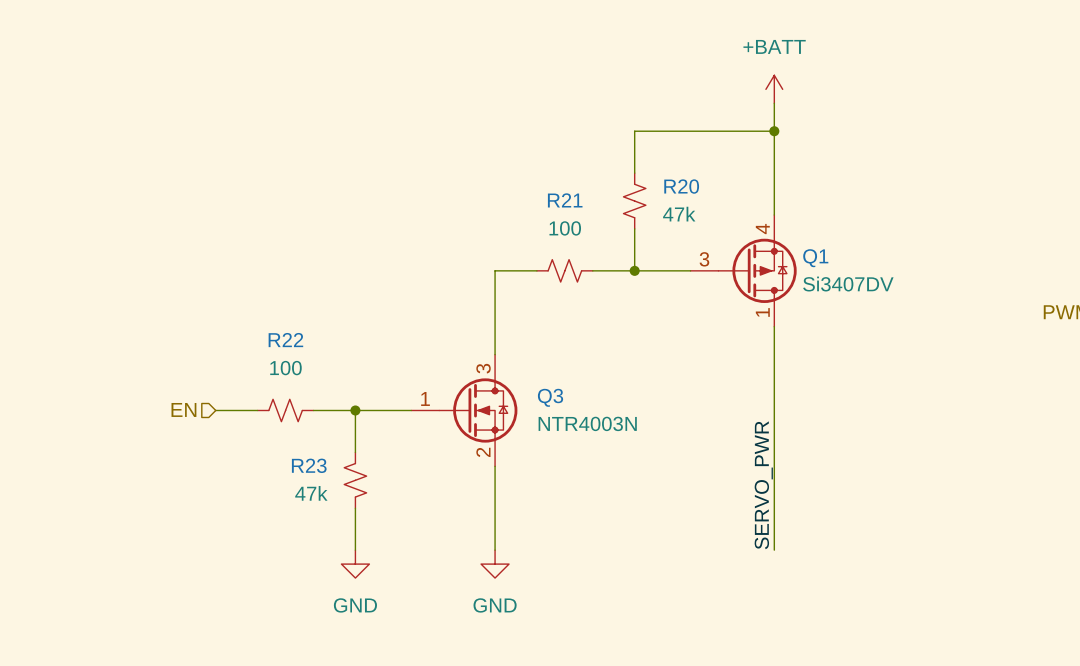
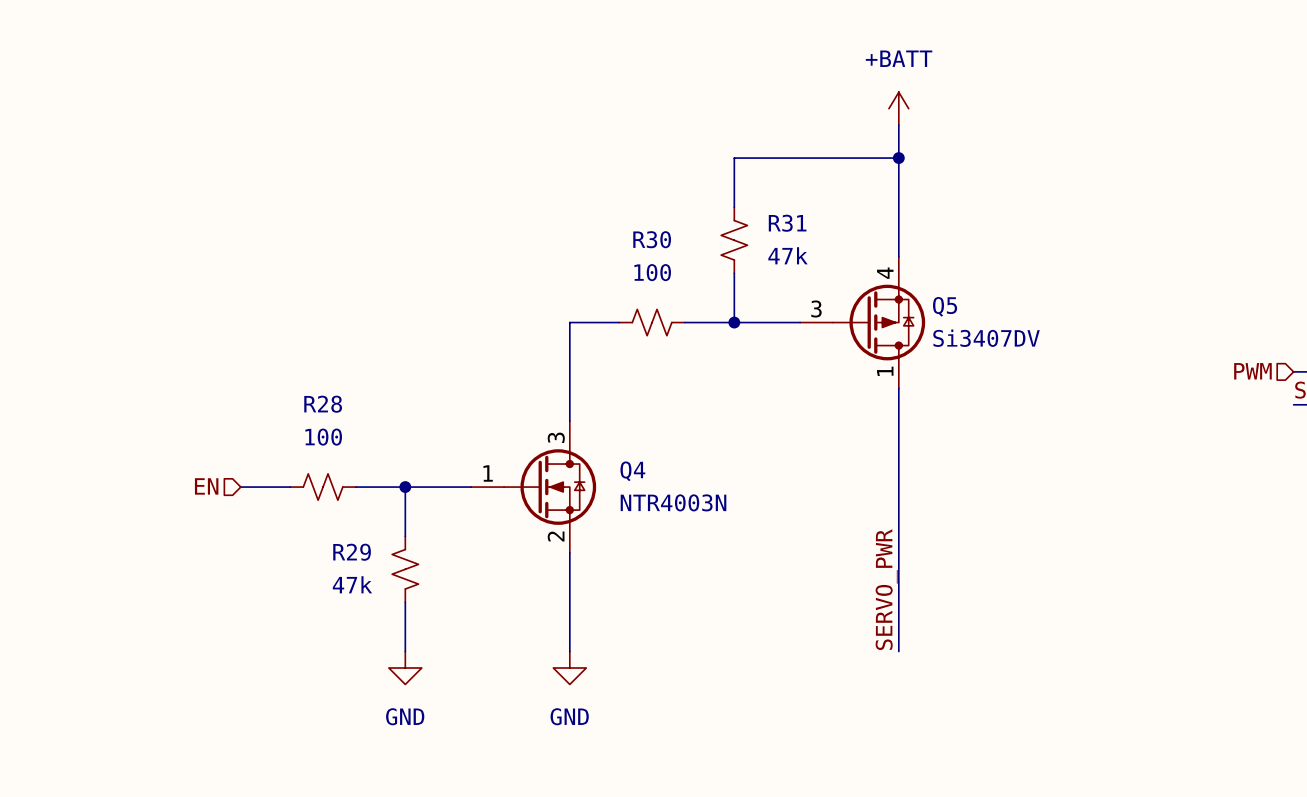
R20 name: R20 (681, 186) -> R31 (787, 223)
R21 name: R21 (565, 200) -> R30 (652, 239)
Q1 name: Q1 (815, 258) -> Q5 (945, 306)
R22 name: R22 (285, 340) -> R28 (323, 404)
Q3 name: Q3 (550, 397) -> Q4 (632, 471)
R23 name: R23 (309, 465) -> R29 (352, 552)

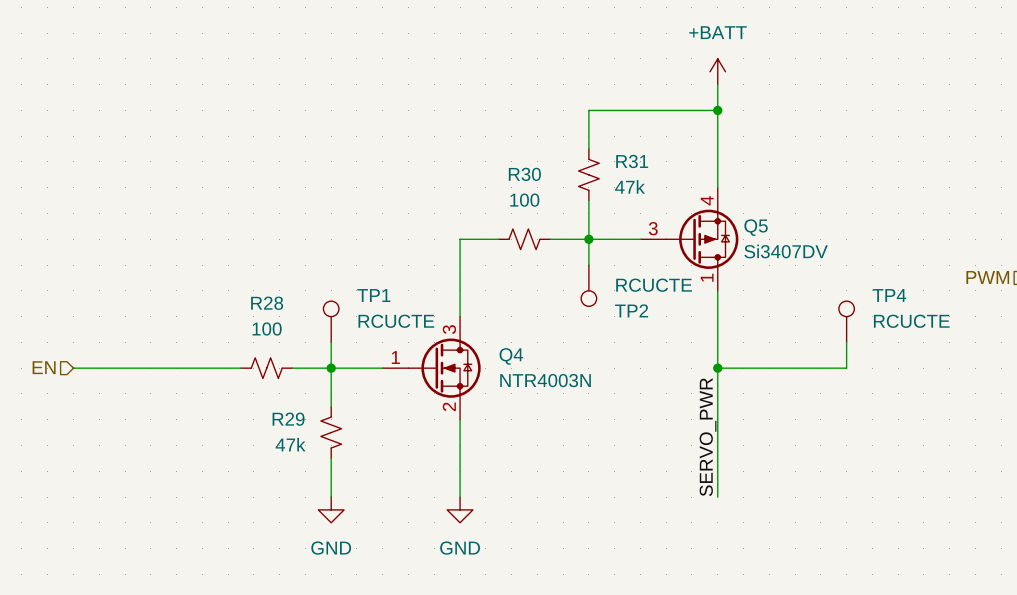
wire: none -> (588, 239) (588, 265)
TP2: none -> RCUCTE (588, 285)
TP1: none -> RCUCTE (331, 321)
TP4: none -> RCUCTE (846, 321)
wire: none -> (331, 342) (331, 368)
wire: none -> (846, 342) (846, 368) (717, 368)
hierarchical label position: EN (206, 486) -> EN (44, 367)
wire: none -> (73, 368) (202, 368)
junction: none -> (717, 368)

